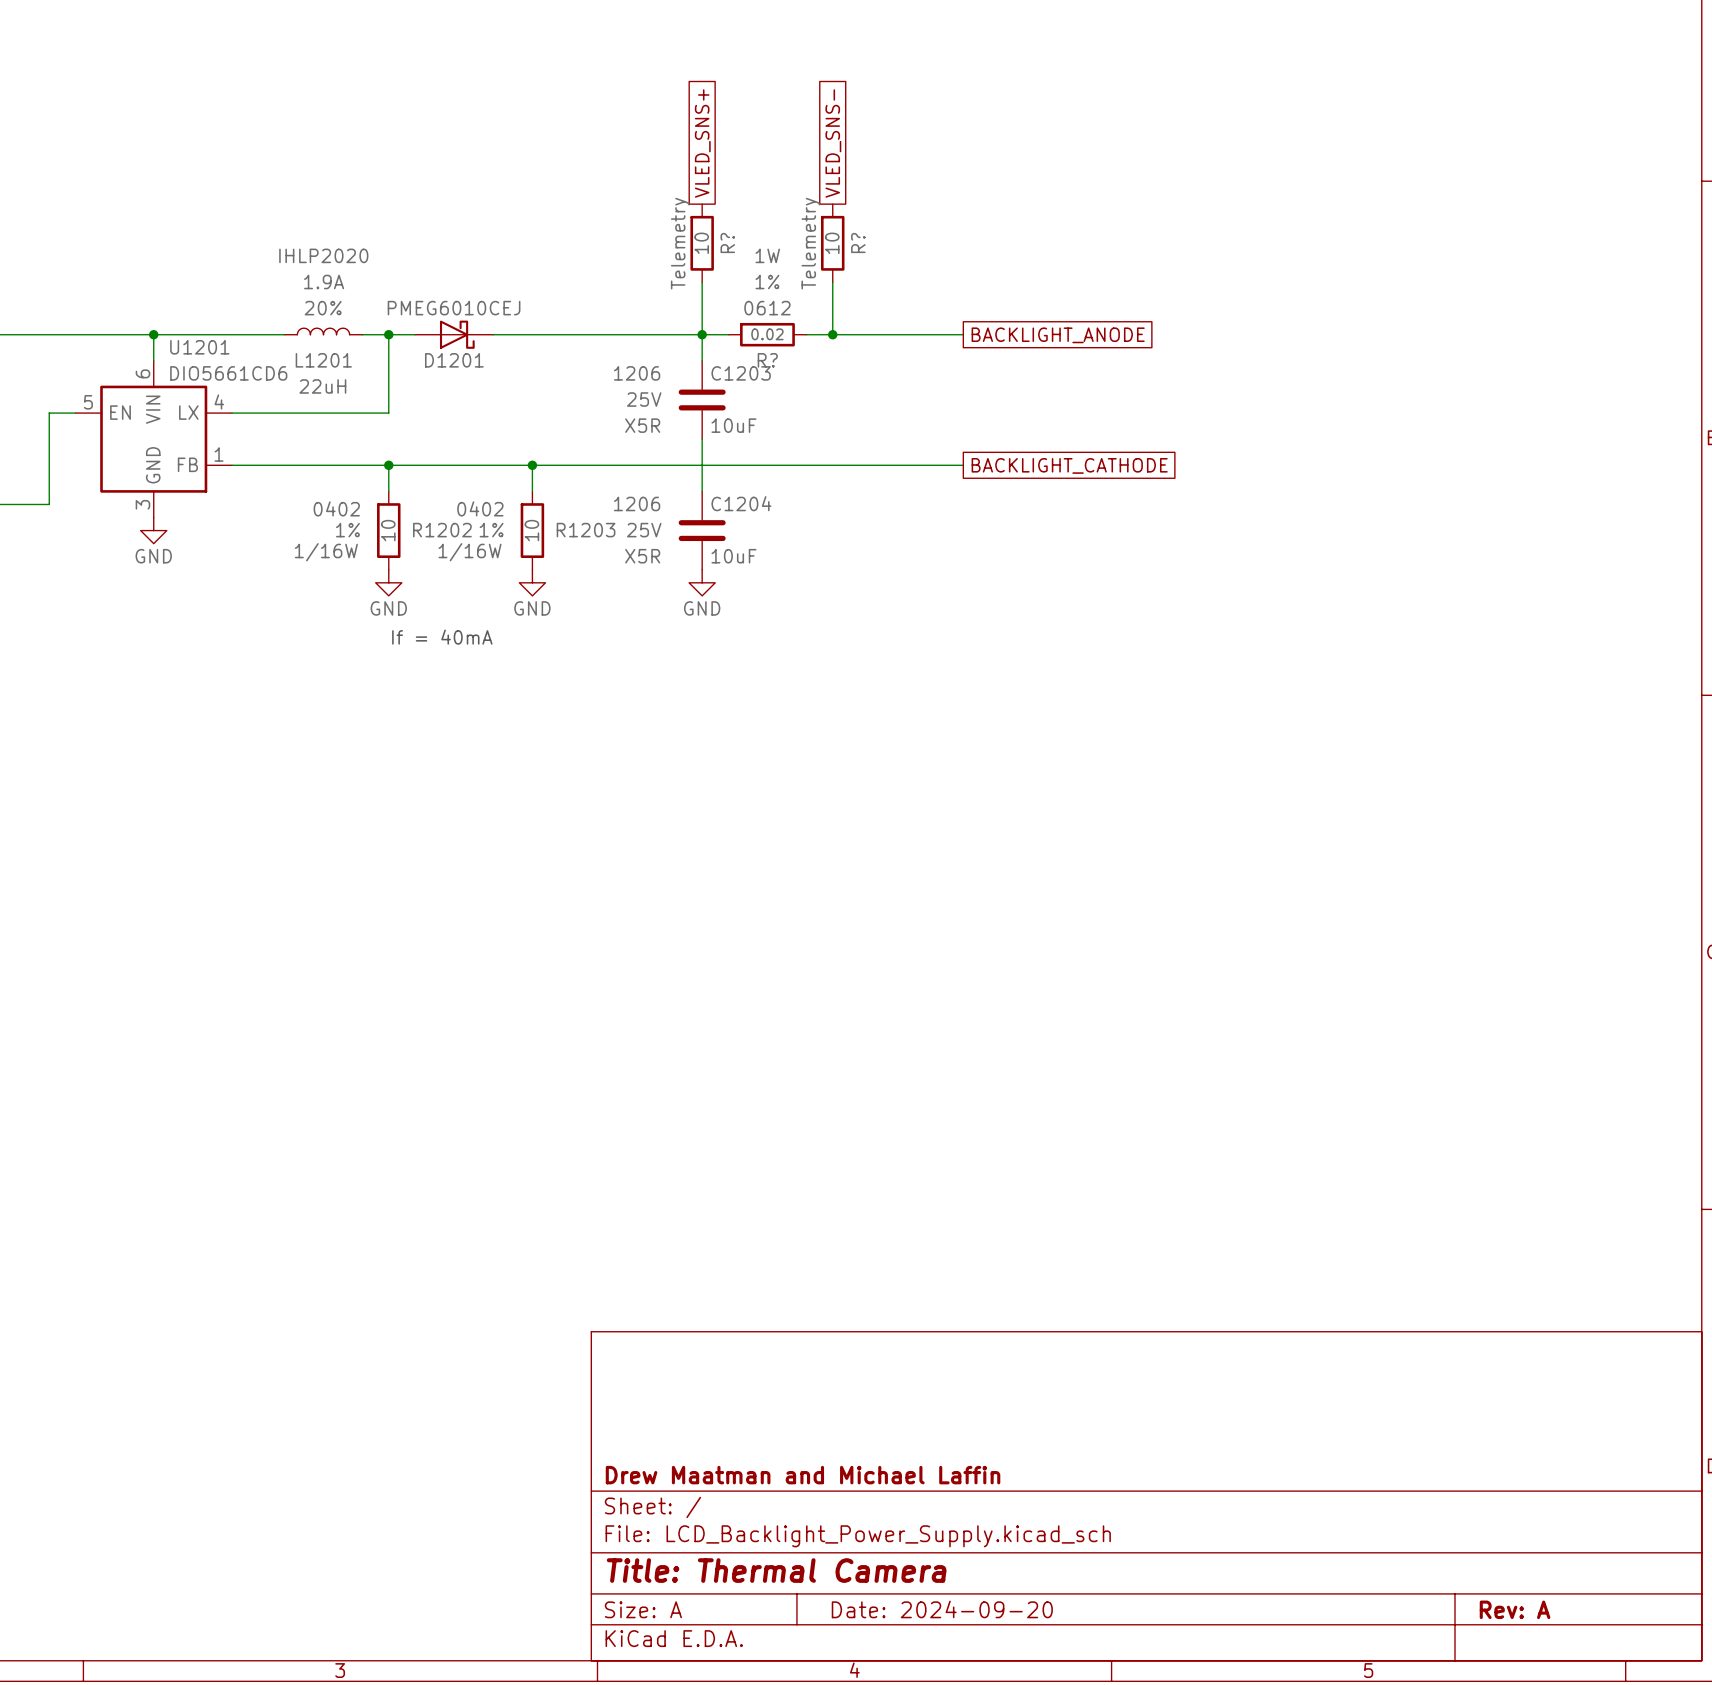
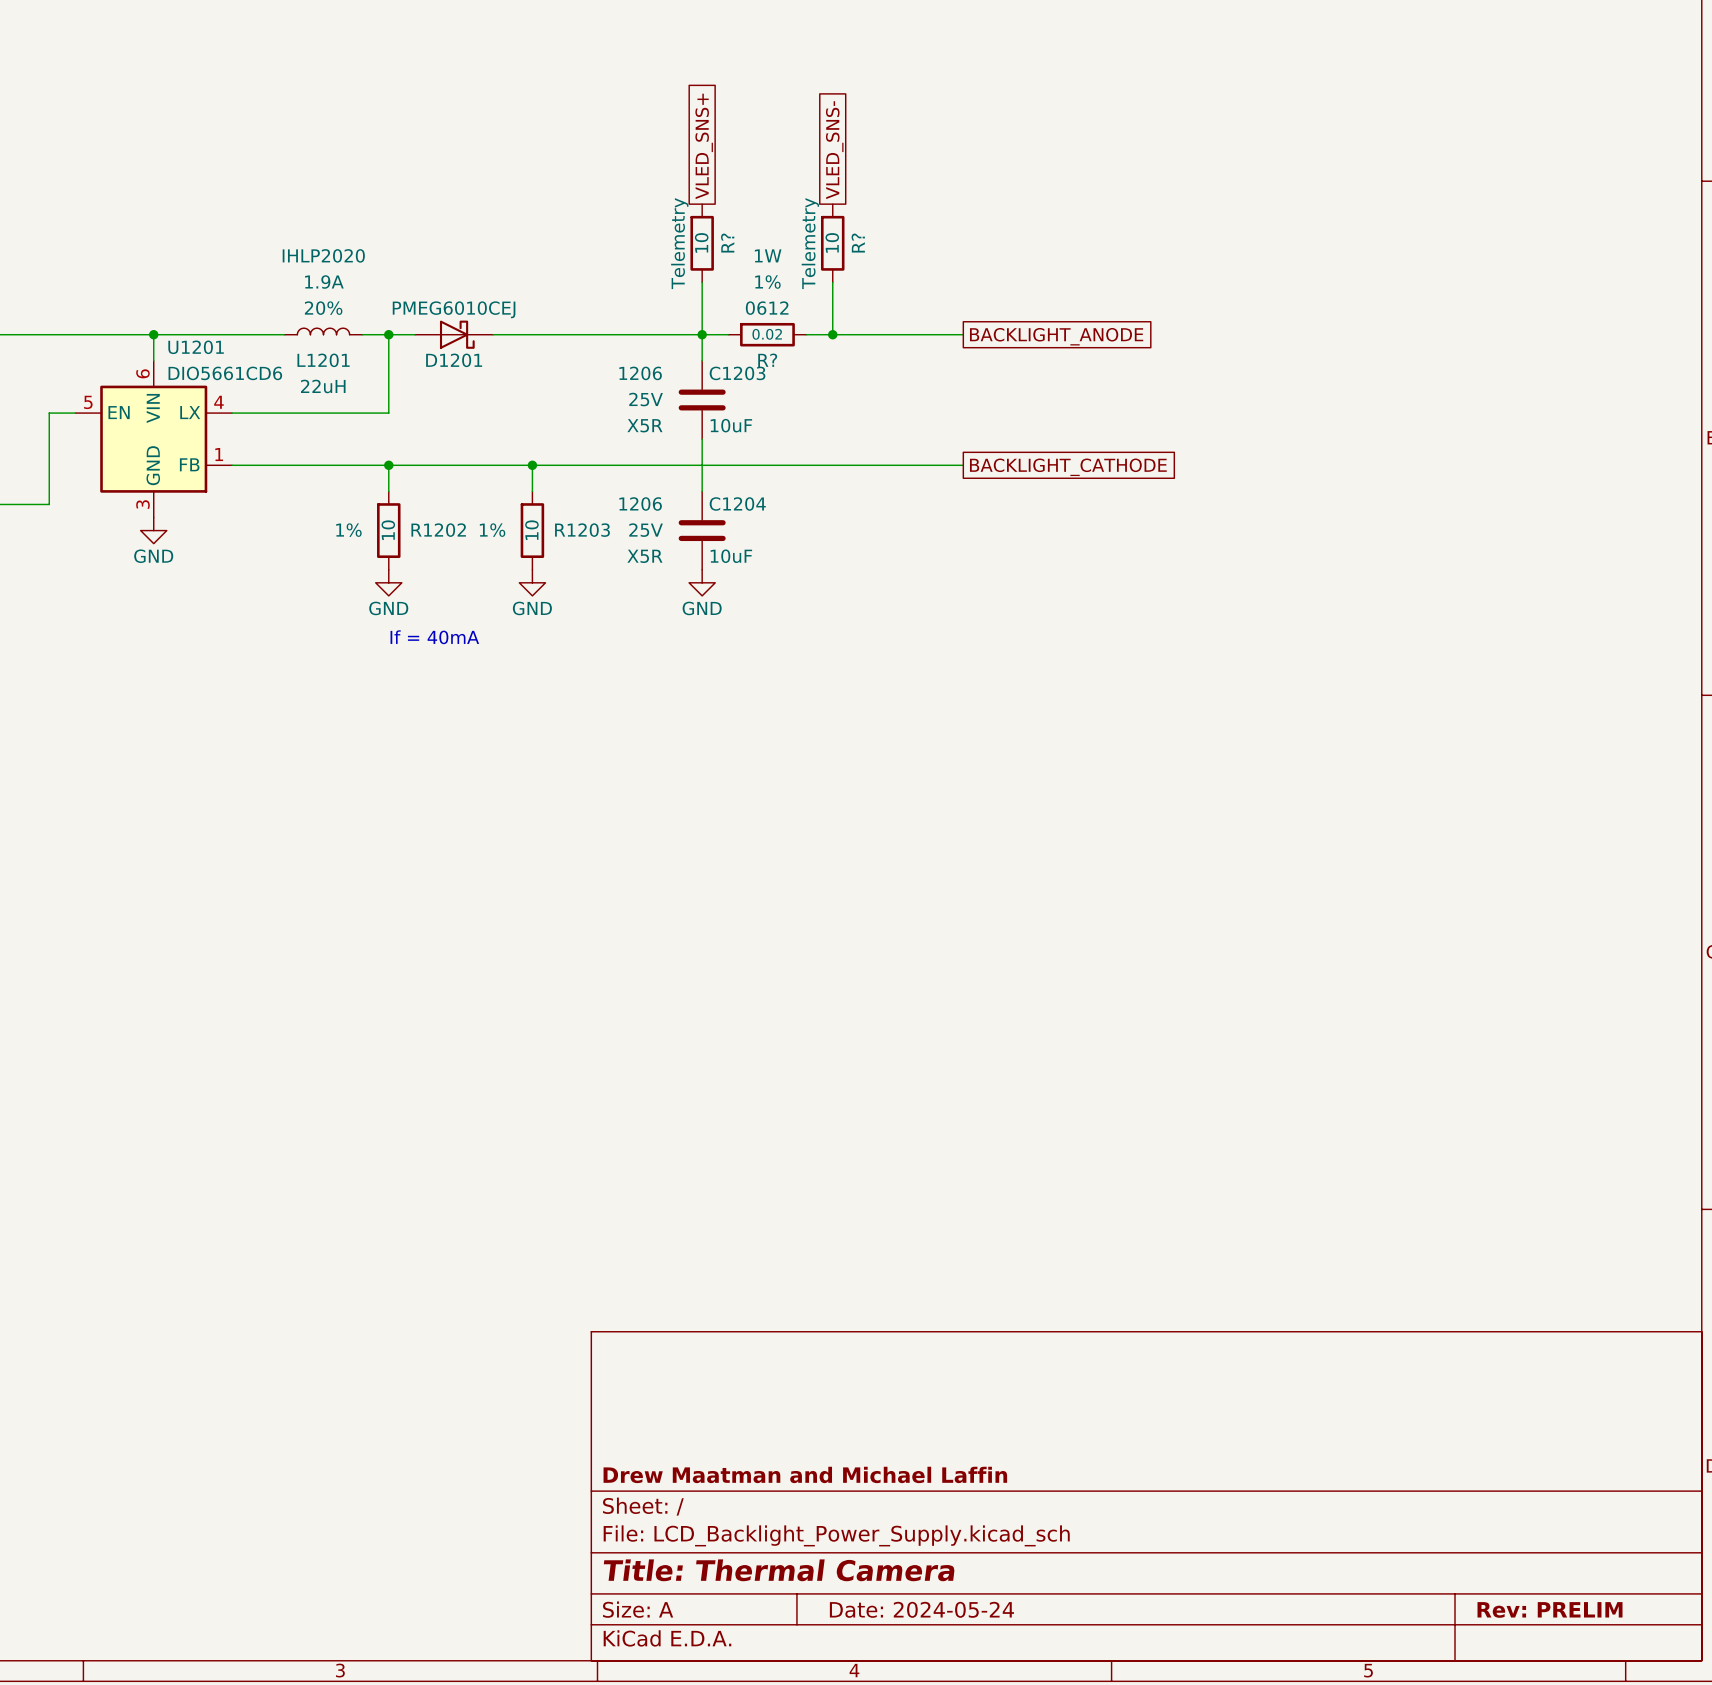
R1202 text: 0402 (336, 508) -> none
R1203 text: 0402 (480, 508) -> none
R1202 text: 1/16W (326, 552) -> none
R1203 text: 1/16W (470, 552) -> none
title block: Date: 2024-09-20 (942, 1609) -> Date: 2024-05-24 (921, 1609)
title block: Rev: A (1515, 1609) -> Rev: PRELIM (1550, 1609)

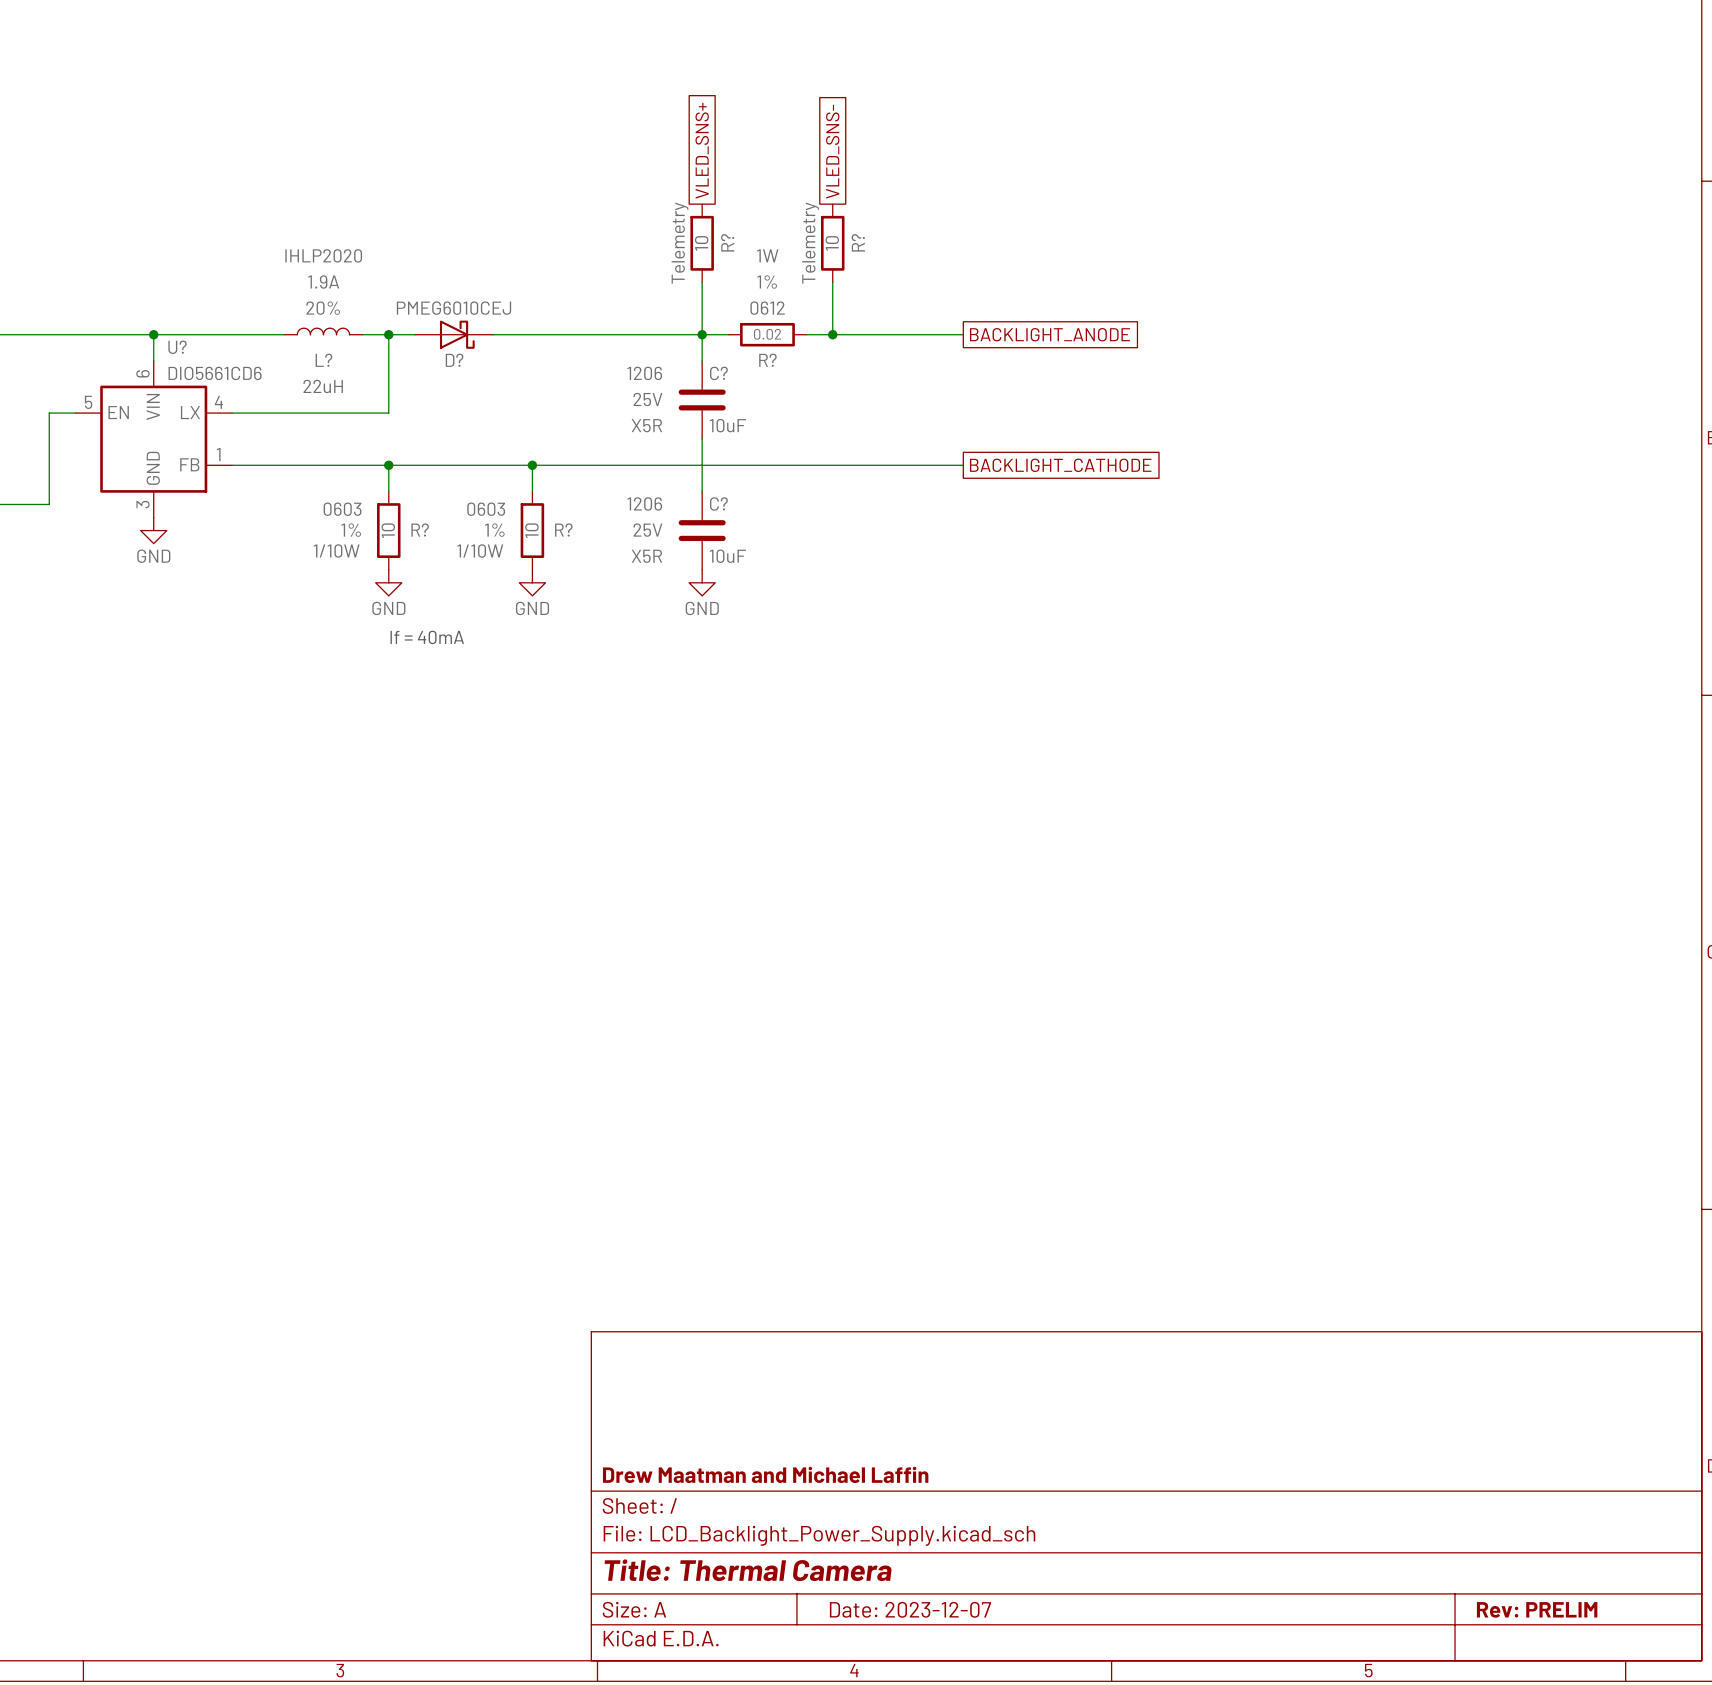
U1201 name: U1201 (196, 347) -> U? (177, 347)
L1201 name: L1201 (323, 360) -> L? (323, 360)
D1201 name: D1201 (454, 360) -> D? (454, 360)
C1203 name: C1203 (737, 373) -> C? (718, 373)
C1204 name: C1204 (737, 503) -> C? (718, 503)
R1202 text: none -> 0603 (342, 509)
R1203 text: none -> 0603 (486, 509)
R1202 name: R1202 (438, 530) -> R? (420, 530)
R1203 name: R1203 (582, 530) -> R? (563, 530)
R1202 text: none -> 1/10W (336, 551)
R1203 text: none -> 1/10W (480, 551)
title block: Date: 2024-05-24 (921, 1609) -> Date: 2023-12-07 (910, 1609)

